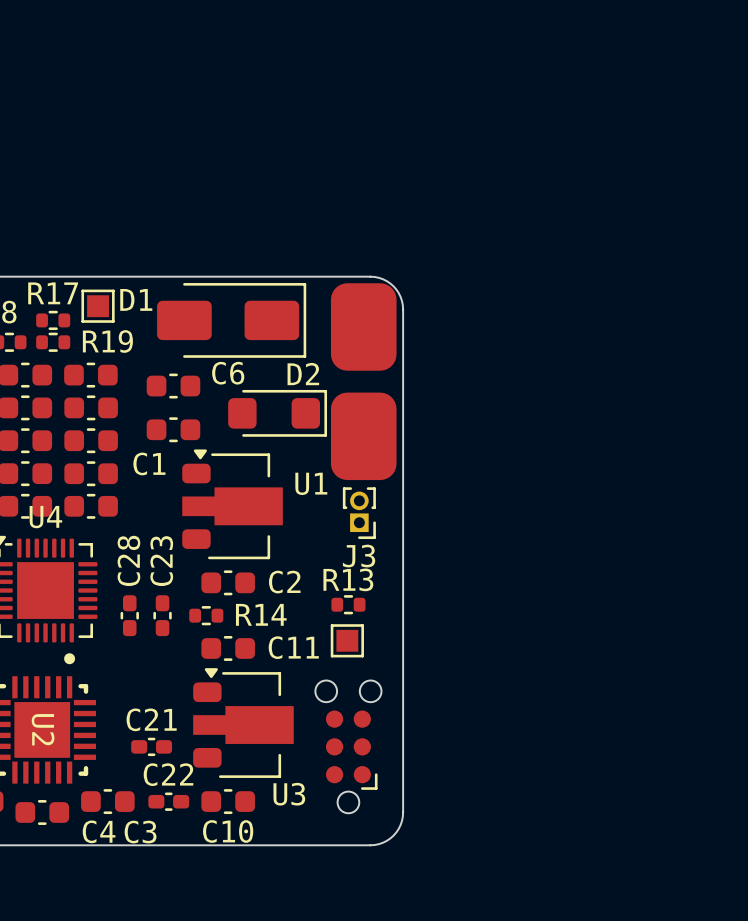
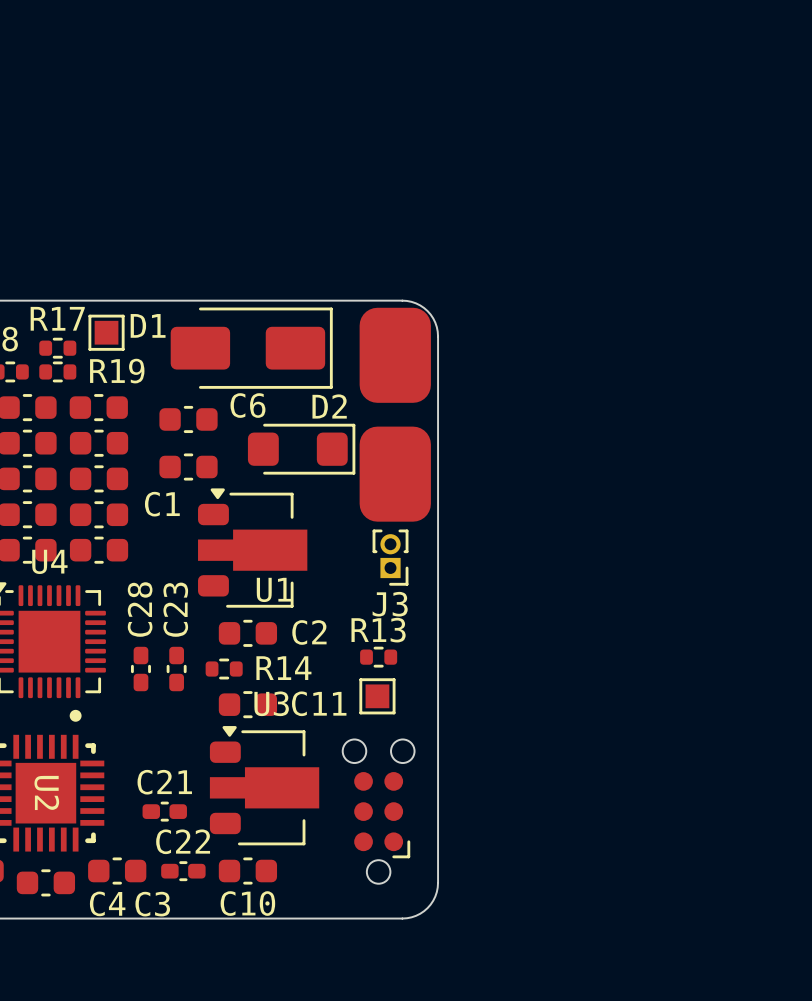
U1 name position: U1 (311, 483) -> U1 (274, 589)
U3 name position: U3 (289, 794) -> U3 (271, 703)

